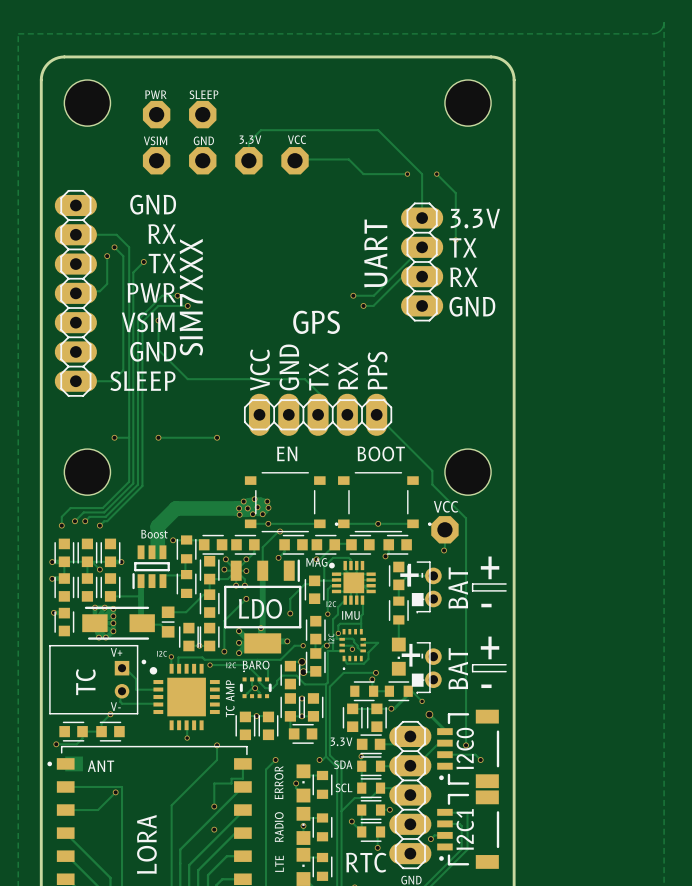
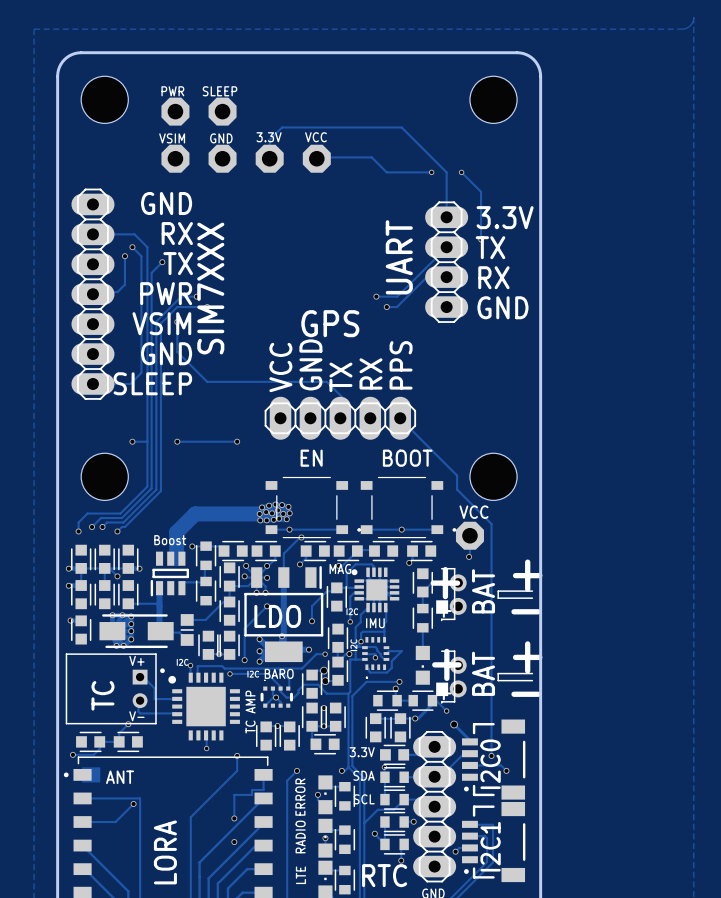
via: none -> (282, 505)
via: none -> (269, 505)
via: (243, 501) -> none
via: none -> (262, 507)
via: none -> (277, 510)
via: none -> (266, 512)
via: none -> (272, 513)
via: (257, 507) -> none
via: (247, 508) -> none
via: none -> (283, 513)
via: none -> (279, 518)
via: none -> (286, 519)
via: none -> (266, 520)
via: (262, 514) -> none

